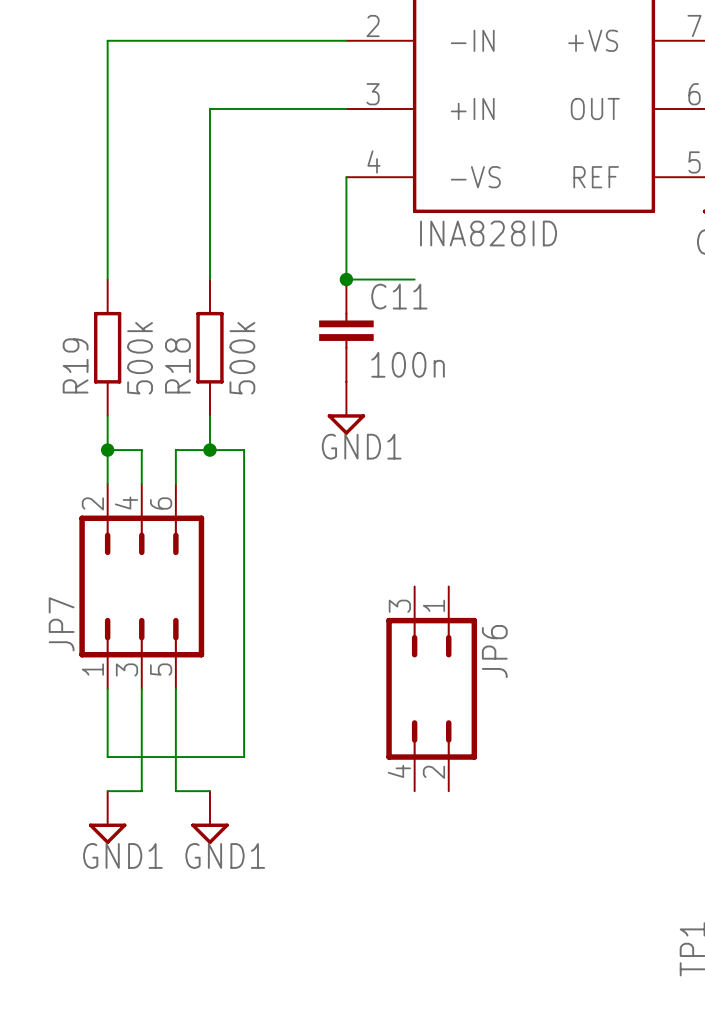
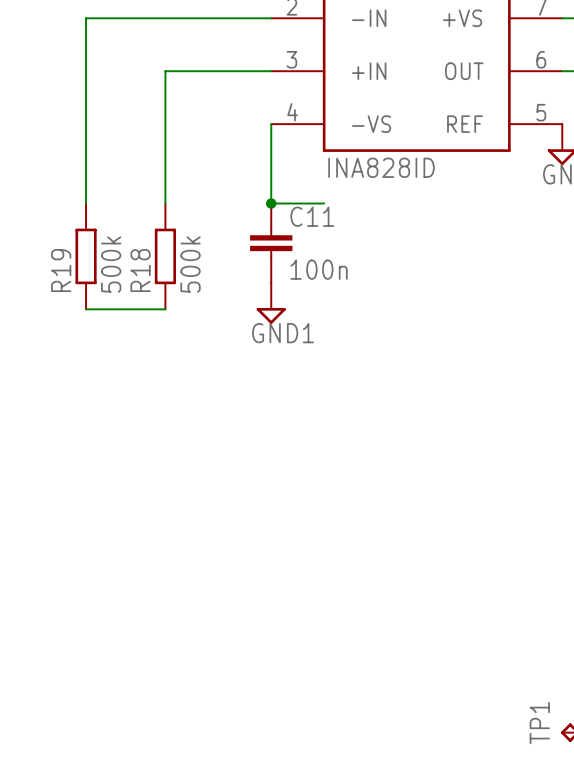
wire: (107, 415) (107, 484) -> none
wire: (209, 415) (209, 450) -> (165, 309) (86, 309)
wire: (107, 450) (141, 450) (141, 484) -> none
junction: (107, 450) -> none
junction: (209, 450) -> none
wire: (175, 484) (175, 450) (244, 450) (244, 757) (107, 757) (107, 688) -> none
JP7: (141, 586) -> none
wire: (141, 688) (141, 791) (107, 791) -> none
wire: (175, 688) (175, 791) (209, 791) -> none
JP6: (431, 688) -> none
power symbol: GND1 (107, 817) -> none
power symbol: GND1 (209, 817) -> none

